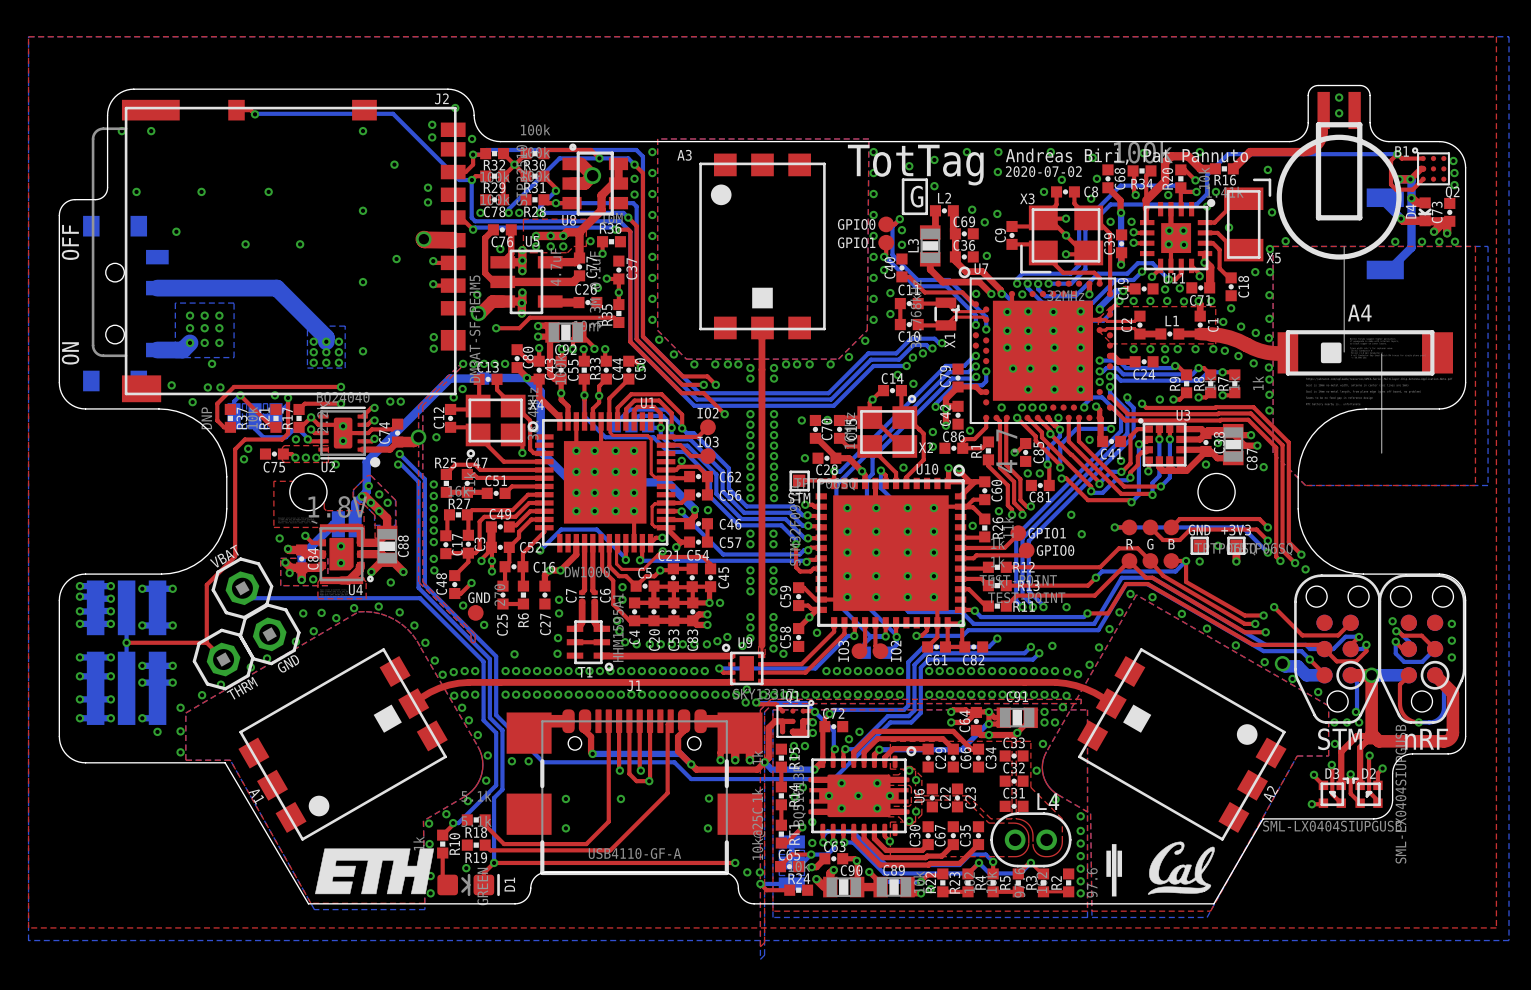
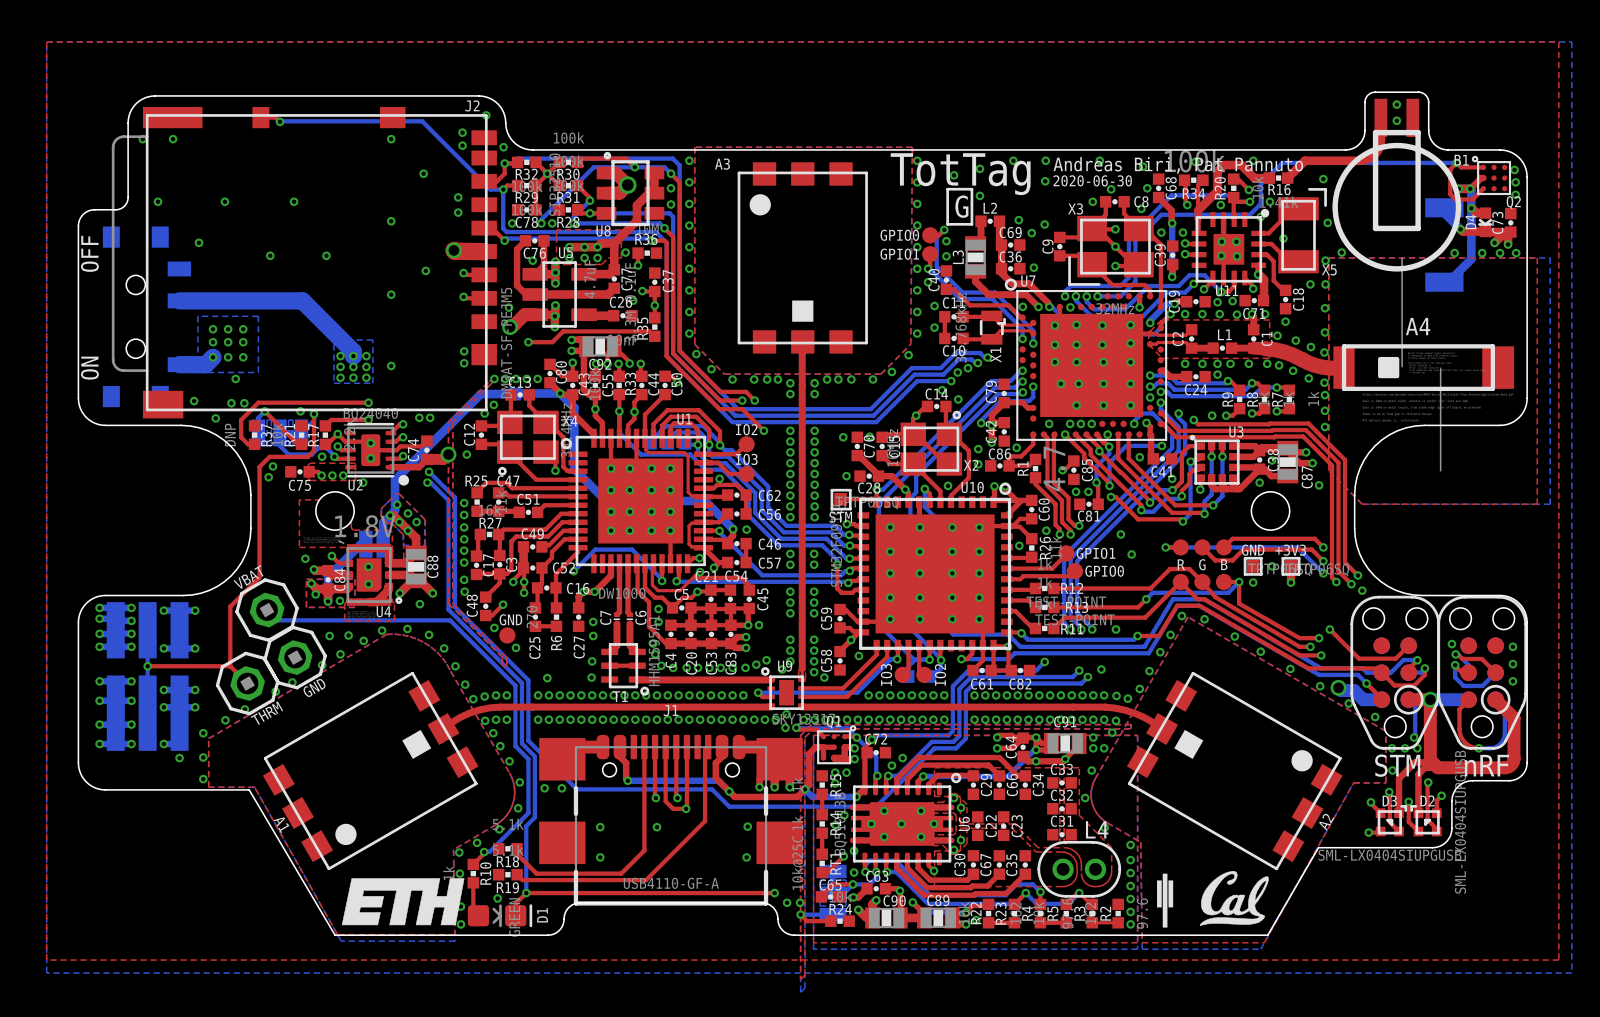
text: 2020-07-02 (1043, 171) -> 2020-06-30 (1092, 180)

